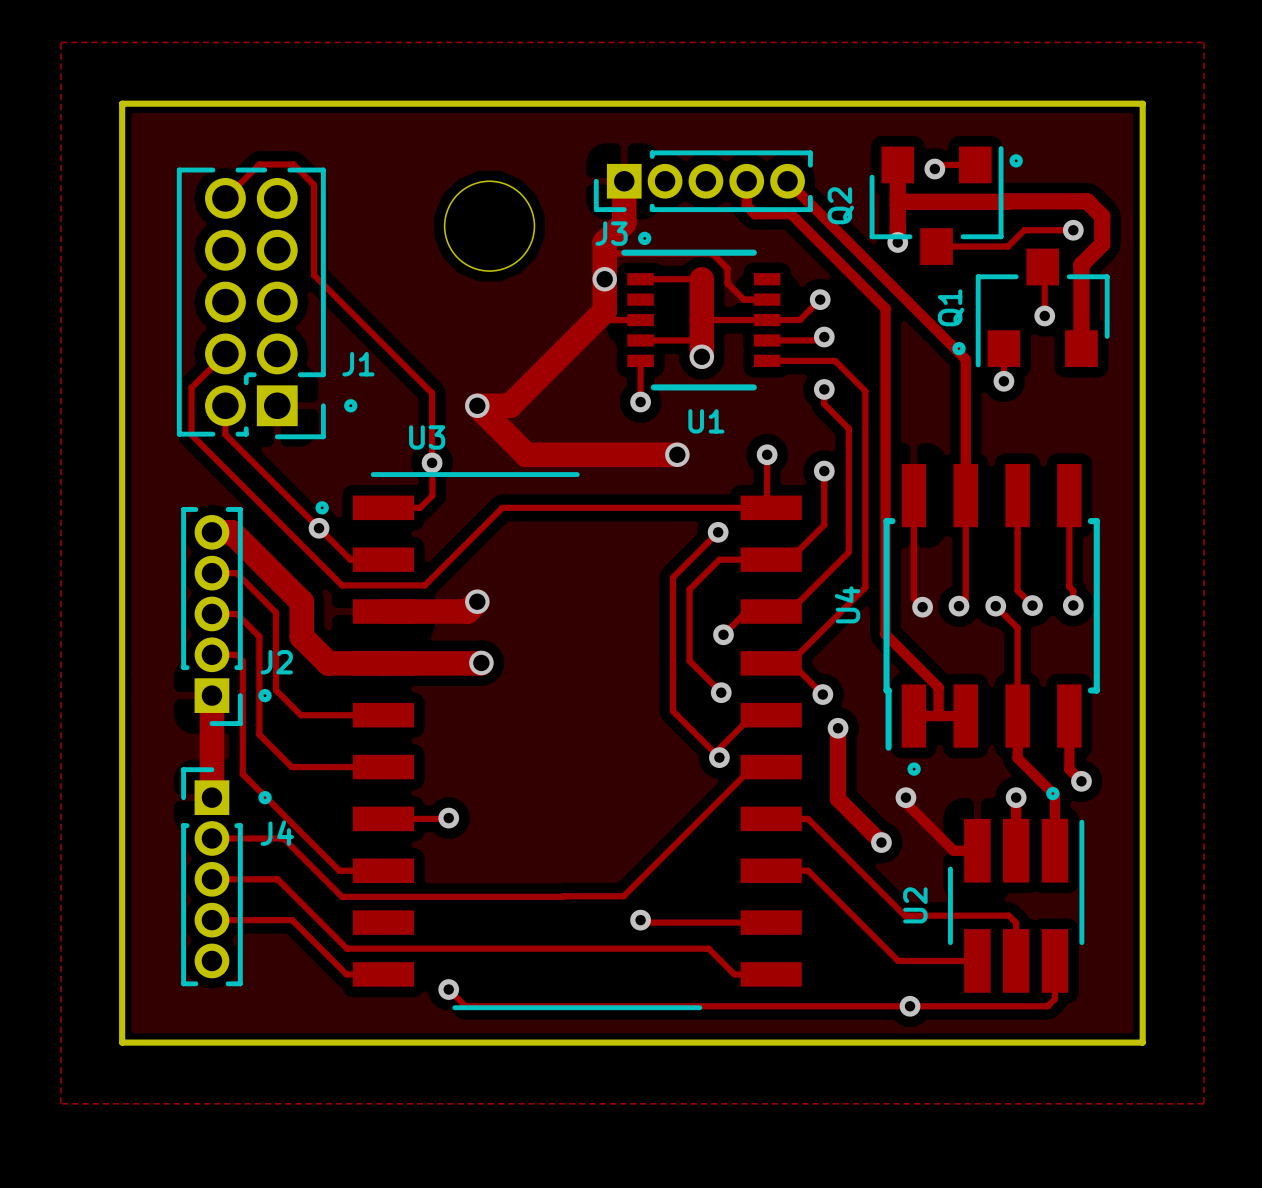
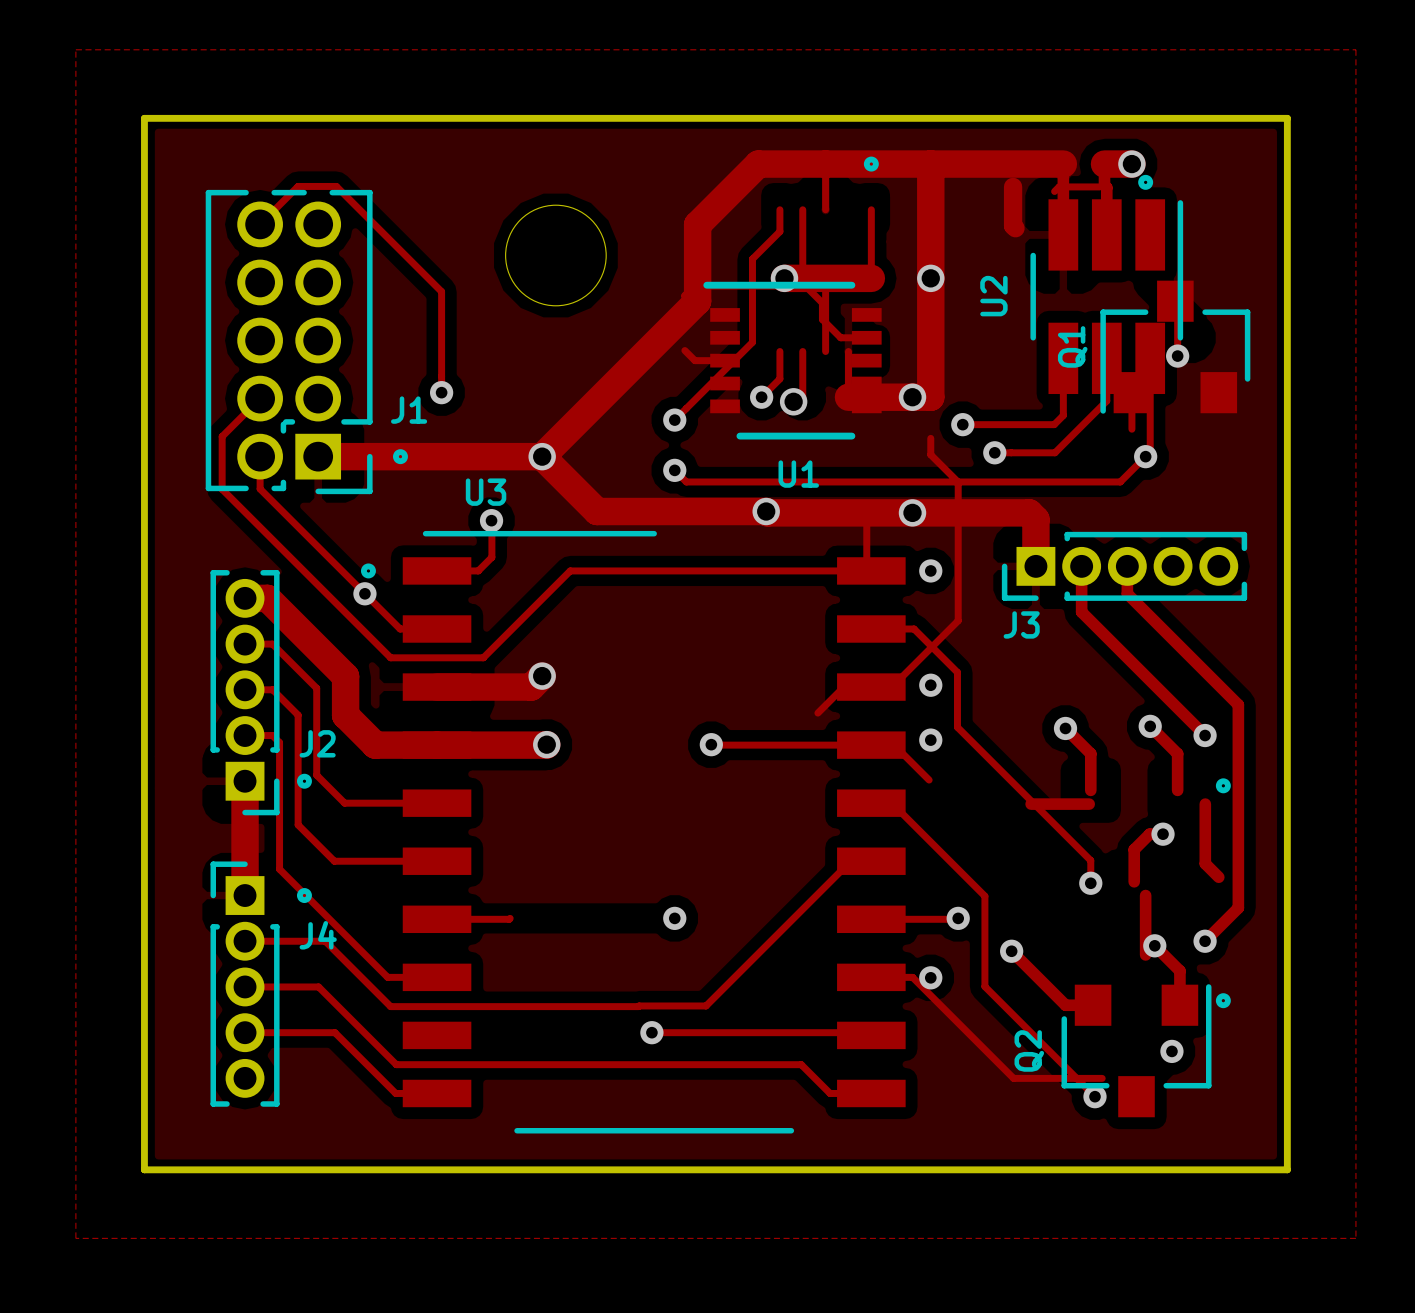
drawing: none -> [863, 156, 879, 172]
track: none -> (825, 164) (825, 209)
track: none -> (930, 164) (930, 397) (848, 397) (848, 351)
track: none -> (1131, 164) (1104, 164) (1104, 185) (1106, 187) (1106, 234)
via: none -> (1131, 164)
via: (934, 169) -> none
track: (624, 181) (624, 223) (604, 242) (604, 311) (509, 405) (477, 405) -> none
J3 position: (703, 181) -> (1124, 566)
track: (746, 181) (746, 205) (755, 214) (791, 214) (885, 308) (885, 634) (938, 687) (938, 716) -> none
track: (787, 181) (965, 359) (965, 599) (959, 606) -> none
track: (314, 184) (314, 275) (432, 393) (432, 462) -> (359, 209) (441, 291) (441, 392)
track: none -> (779, 209) (779, 231) (752, 259) (752, 342) (674, 420)
track: none -> (802, 209) (802, 278)
track: none -> (871, 209) (871, 278) (784, 278)
track: (1006, 201) (1087, 201) (1102, 216) (1102, 244) (1081, 264) (1081, 348) -> none
track: (1006, 201) (899, 201) (897, 204) (897, 242) -> none
Q2 position: (936, 205) -> (1136, 1050)
track: none -> (1063, 234) (1063, 164) (758, 164) (697, 224) (697, 301) (542, 456) (318, 456)
track: (1073, 230) (1024, 230) (1007, 246) (936, 246) -> none
via: (1073, 230) -> none
drawing: [638, 231, 652, 246] -> none
via: (897, 242) -> none
track: none -> (825, 278) (825, 351)
via: none -> (930, 278)
via position: (604, 279) -> (784, 278)
track: (640, 279) (701, 279) (701, 356) -> none
track: (820, 299) (799, 320) (701, 320) -> none
via: (820, 299) -> none
track: none -> (779, 351) (779, 378) (761, 397)
track: none -> (1063, 358) (1063, 415) (1054, 424) (962, 424)
track: none -> (1106, 358) (1106, 400) (1054, 452) (994, 452)
track: none -> (1150, 358) (1150, 452) (1120, 481) (686, 481) (674, 470)
track: (824, 337) (820, 340) (767, 340) -> none
via position: (824, 337) -> (912, 397)
track: (640, 340) (701, 340) -> none
drawing: [952, 341, 966, 356] -> none
via: none -> (441, 392)
via: none -> (761, 397)
track: (640, 360) (640, 402) -> (802, 351) (802, 397)
track: (767, 360) (835, 360) (865, 391) (865, 587) (789, 663) -> none
via: none -> (674, 420)
via: none -> (962, 424)
via position: (1003, 381) -> (1145, 456)
via: (824, 389) -> none
via: (640, 402) -> none
via: none -> (994, 452)
via: none -> (674, 470)
track: none -> (766, 511) (1029, 512) (1035, 519) (1035, 566)
via: (767, 454) -> none
via: none -> (912, 512)
track: (824, 471) (824, 524) (789, 559) -> (1090, 883) (1090, 860) (957, 727) (957, 672) (914, 629) (891, 629)
via position: (824, 471) -> (930, 570)
track: (913, 495) (913, 598) (922, 607) -> none
track: (1017, 495) (1017, 590) (1032, 605) -> none
track: (1069, 495) (1069, 586) (1073, 590) (1073, 605) -> none
track: none -> (1081, 566) (1081, 612) (1205, 735)
track: none -> (1127, 566) (1127, 593) (1238, 704) (1238, 907) (1205, 941)
track: (718, 532) (672, 577) (672, 711) (719, 757) (719, 748) (752, 715) (771, 715) -> none
via: (718, 532) -> none
track: (771, 559) (719, 559) (689, 589) (689, 661) (721, 692) -> none
via: (1032, 605) -> none
via: (1073, 605) -> none
via: (959, 606) -> none
track: (995, 606) (1017, 627) (1017, 758) (1054, 795) (1054, 850) -> none
via: (995, 606) -> none
via: (922, 607) -> none
U4: (991, 607) -> none
via: none -> (930, 685)
via: (723, 634) -> none
track: none -> (1150, 726) (1177, 753) (1177, 790)
via: none -> (1150, 726)
track: none -> (1065, 728) (1090, 753) (1090, 790)
via: none -> (1065, 728)
via: none -> (1205, 735)
via: none -> (930, 740)
via: none -> (711, 744)
track: none -> (711, 745) (871, 745) (875, 749)
via: (721, 692) -> none
drawing: none -> [1215, 778, 1231, 794]
via: (822, 694) -> none
track: none -> (891, 803) (984, 896) (984, 986) (1094, 1096)
track: (838, 728) (838, 799) (881, 842) -> none
via: (838, 728) -> none
track: none -> (1163, 834) (1149, 834) (1134, 849) (1134, 881)
via: none -> (1163, 834)
via: (719, 757) -> none
drawing: [907, 762, 921, 776] -> none
via: (1081, 781) -> none
via: none -> (1090, 883)
drawing: [1046, 786, 1060, 801] -> none
track: (905, 797) (905, 802) (953, 850) (977, 850) -> none
via: (905, 797) -> none
via: (1016, 797) -> none
via: (448, 818) -> none
via: none -> (674, 918)
track: (808, 818) (904, 915) (1008, 915) (1016, 922) (1016, 960) -> (912, 919) (958, 918)
via: none -> (958, 918)
via: none -> (1205, 941)
via position: (881, 842) -> (1011, 951)
track: none -> (1154, 945) (1179, 970) (1179, 1005)
via: none -> (1154, 945)
track: none -> (1011, 951) (1065, 1005) (1093, 1005)
via: none -> (930, 977)
drawing: none -> [1215, 993, 1231, 1009]
U2 position: (1016, 905) -> (1106, 296)
via: none -> (651, 1032)
track: (640, 920) (643, 922) (771, 922) -> (651, 1032) (868, 1032) (871, 1035)
via: (640, 920) -> none
via: none -> (1171, 1051)
track: (1054, 960) (1054, 999) (1047, 1006) (465, 1006) (448, 989) -> none
via: (448, 989) -> none
via position: (910, 1006) -> (1094, 1096)

